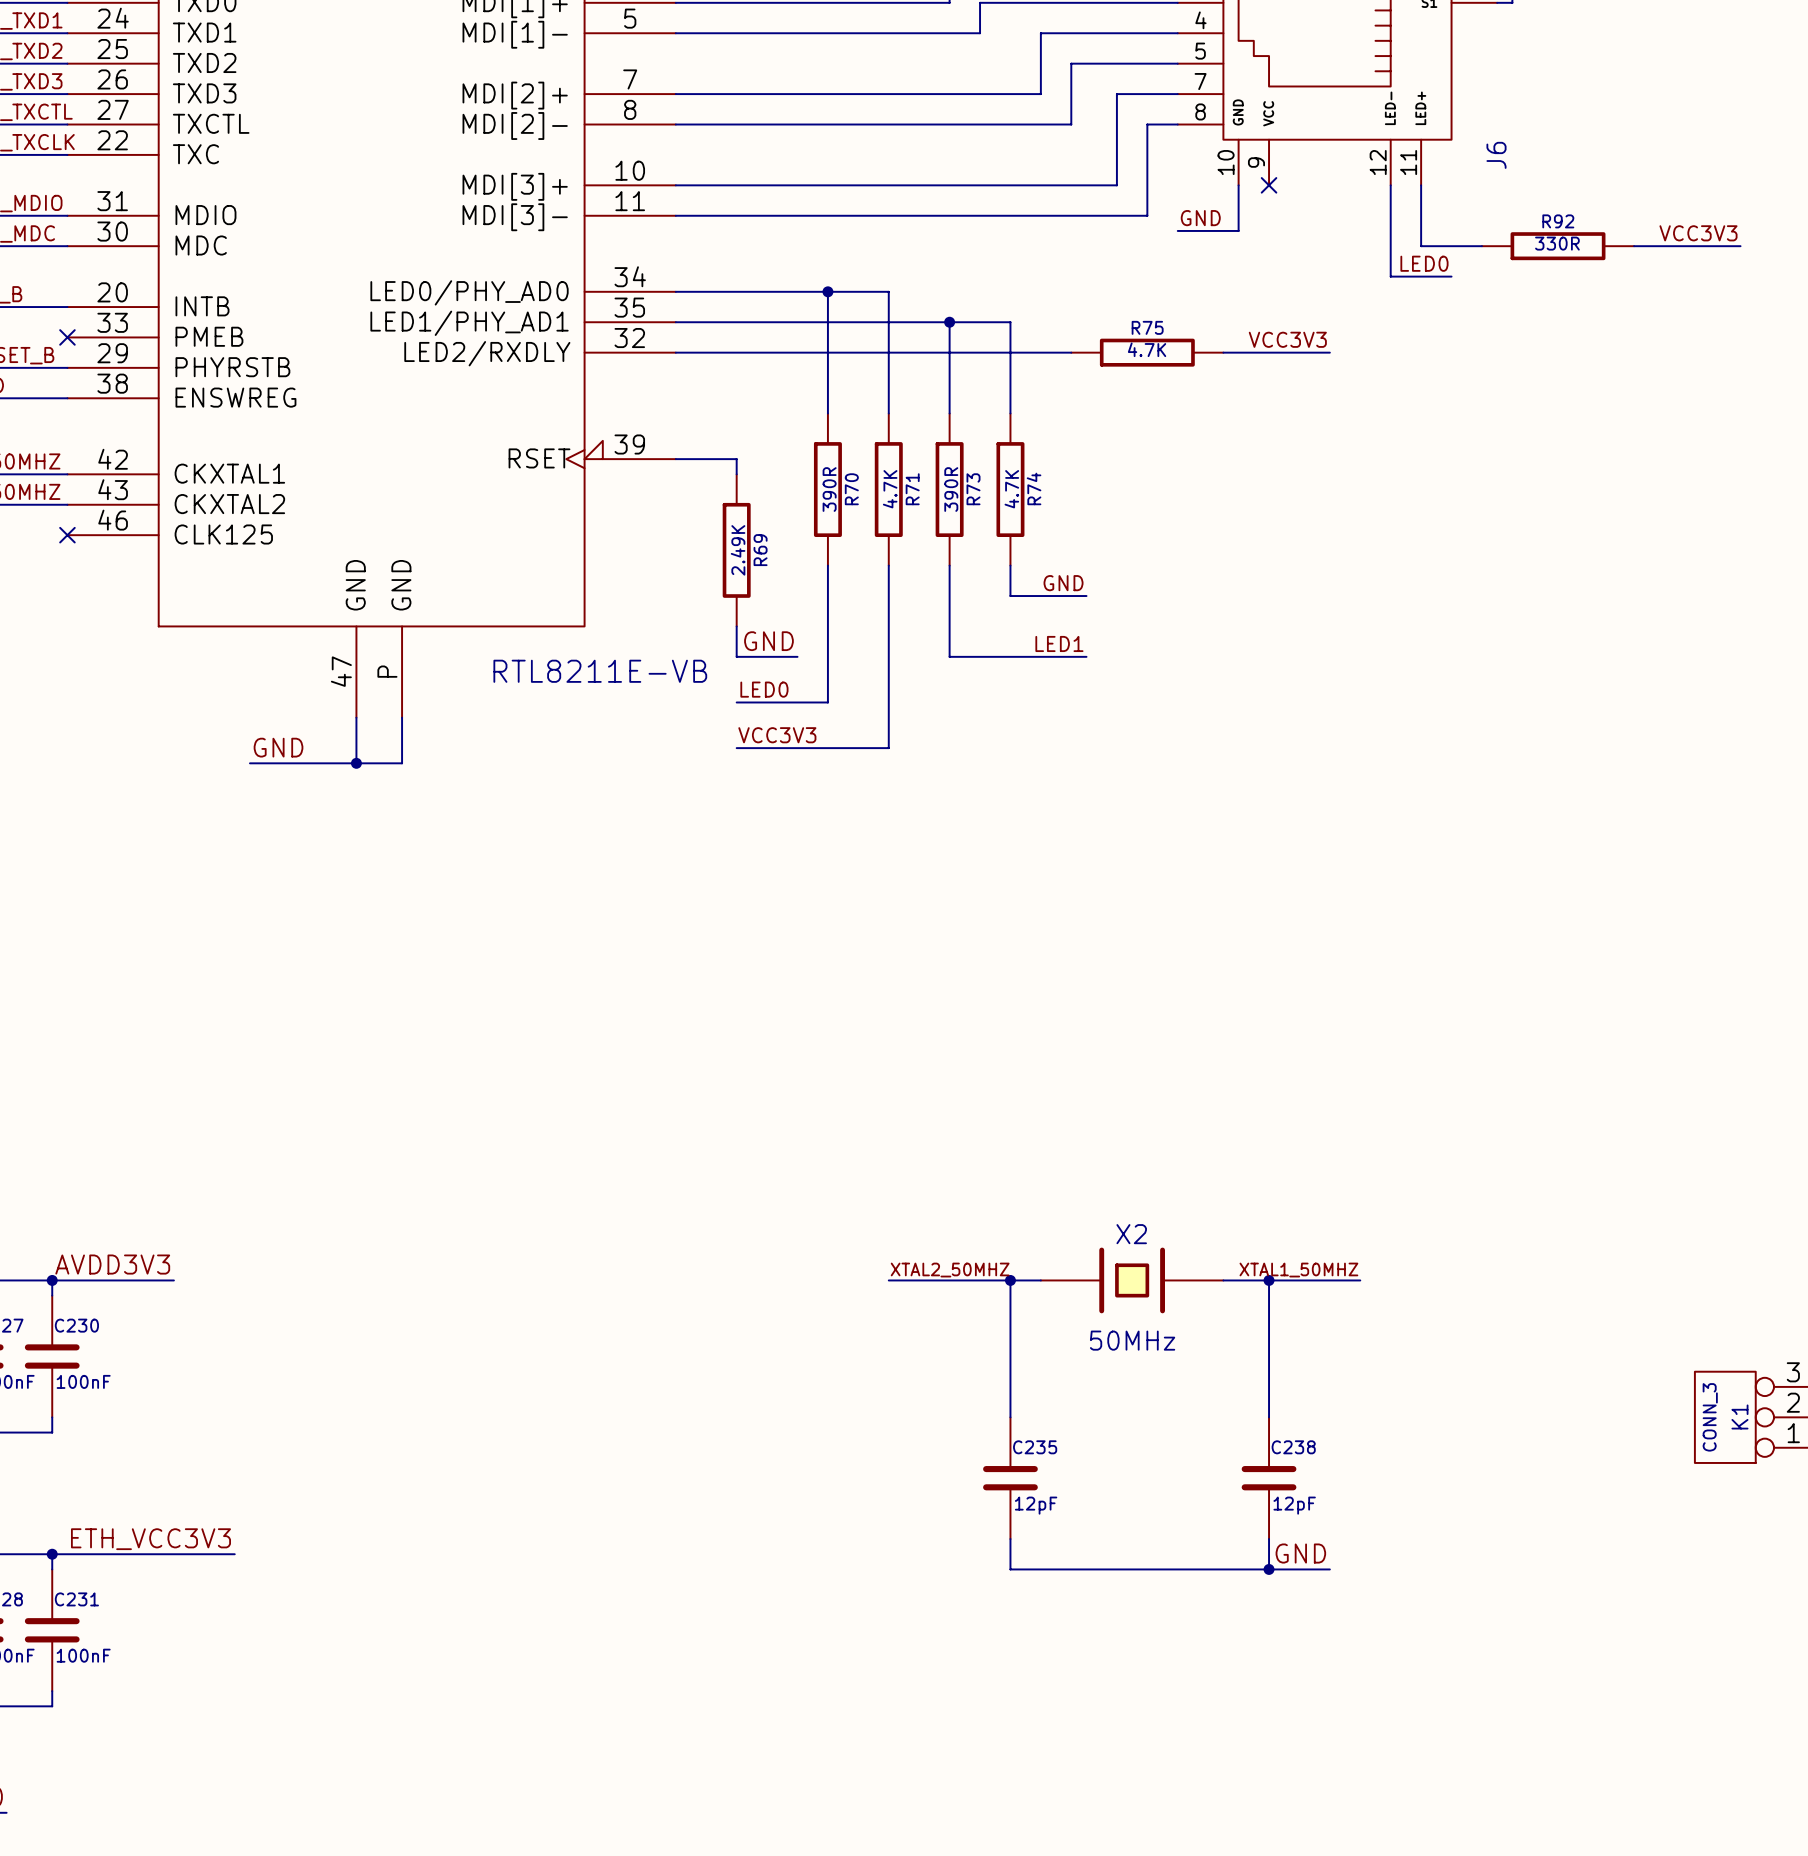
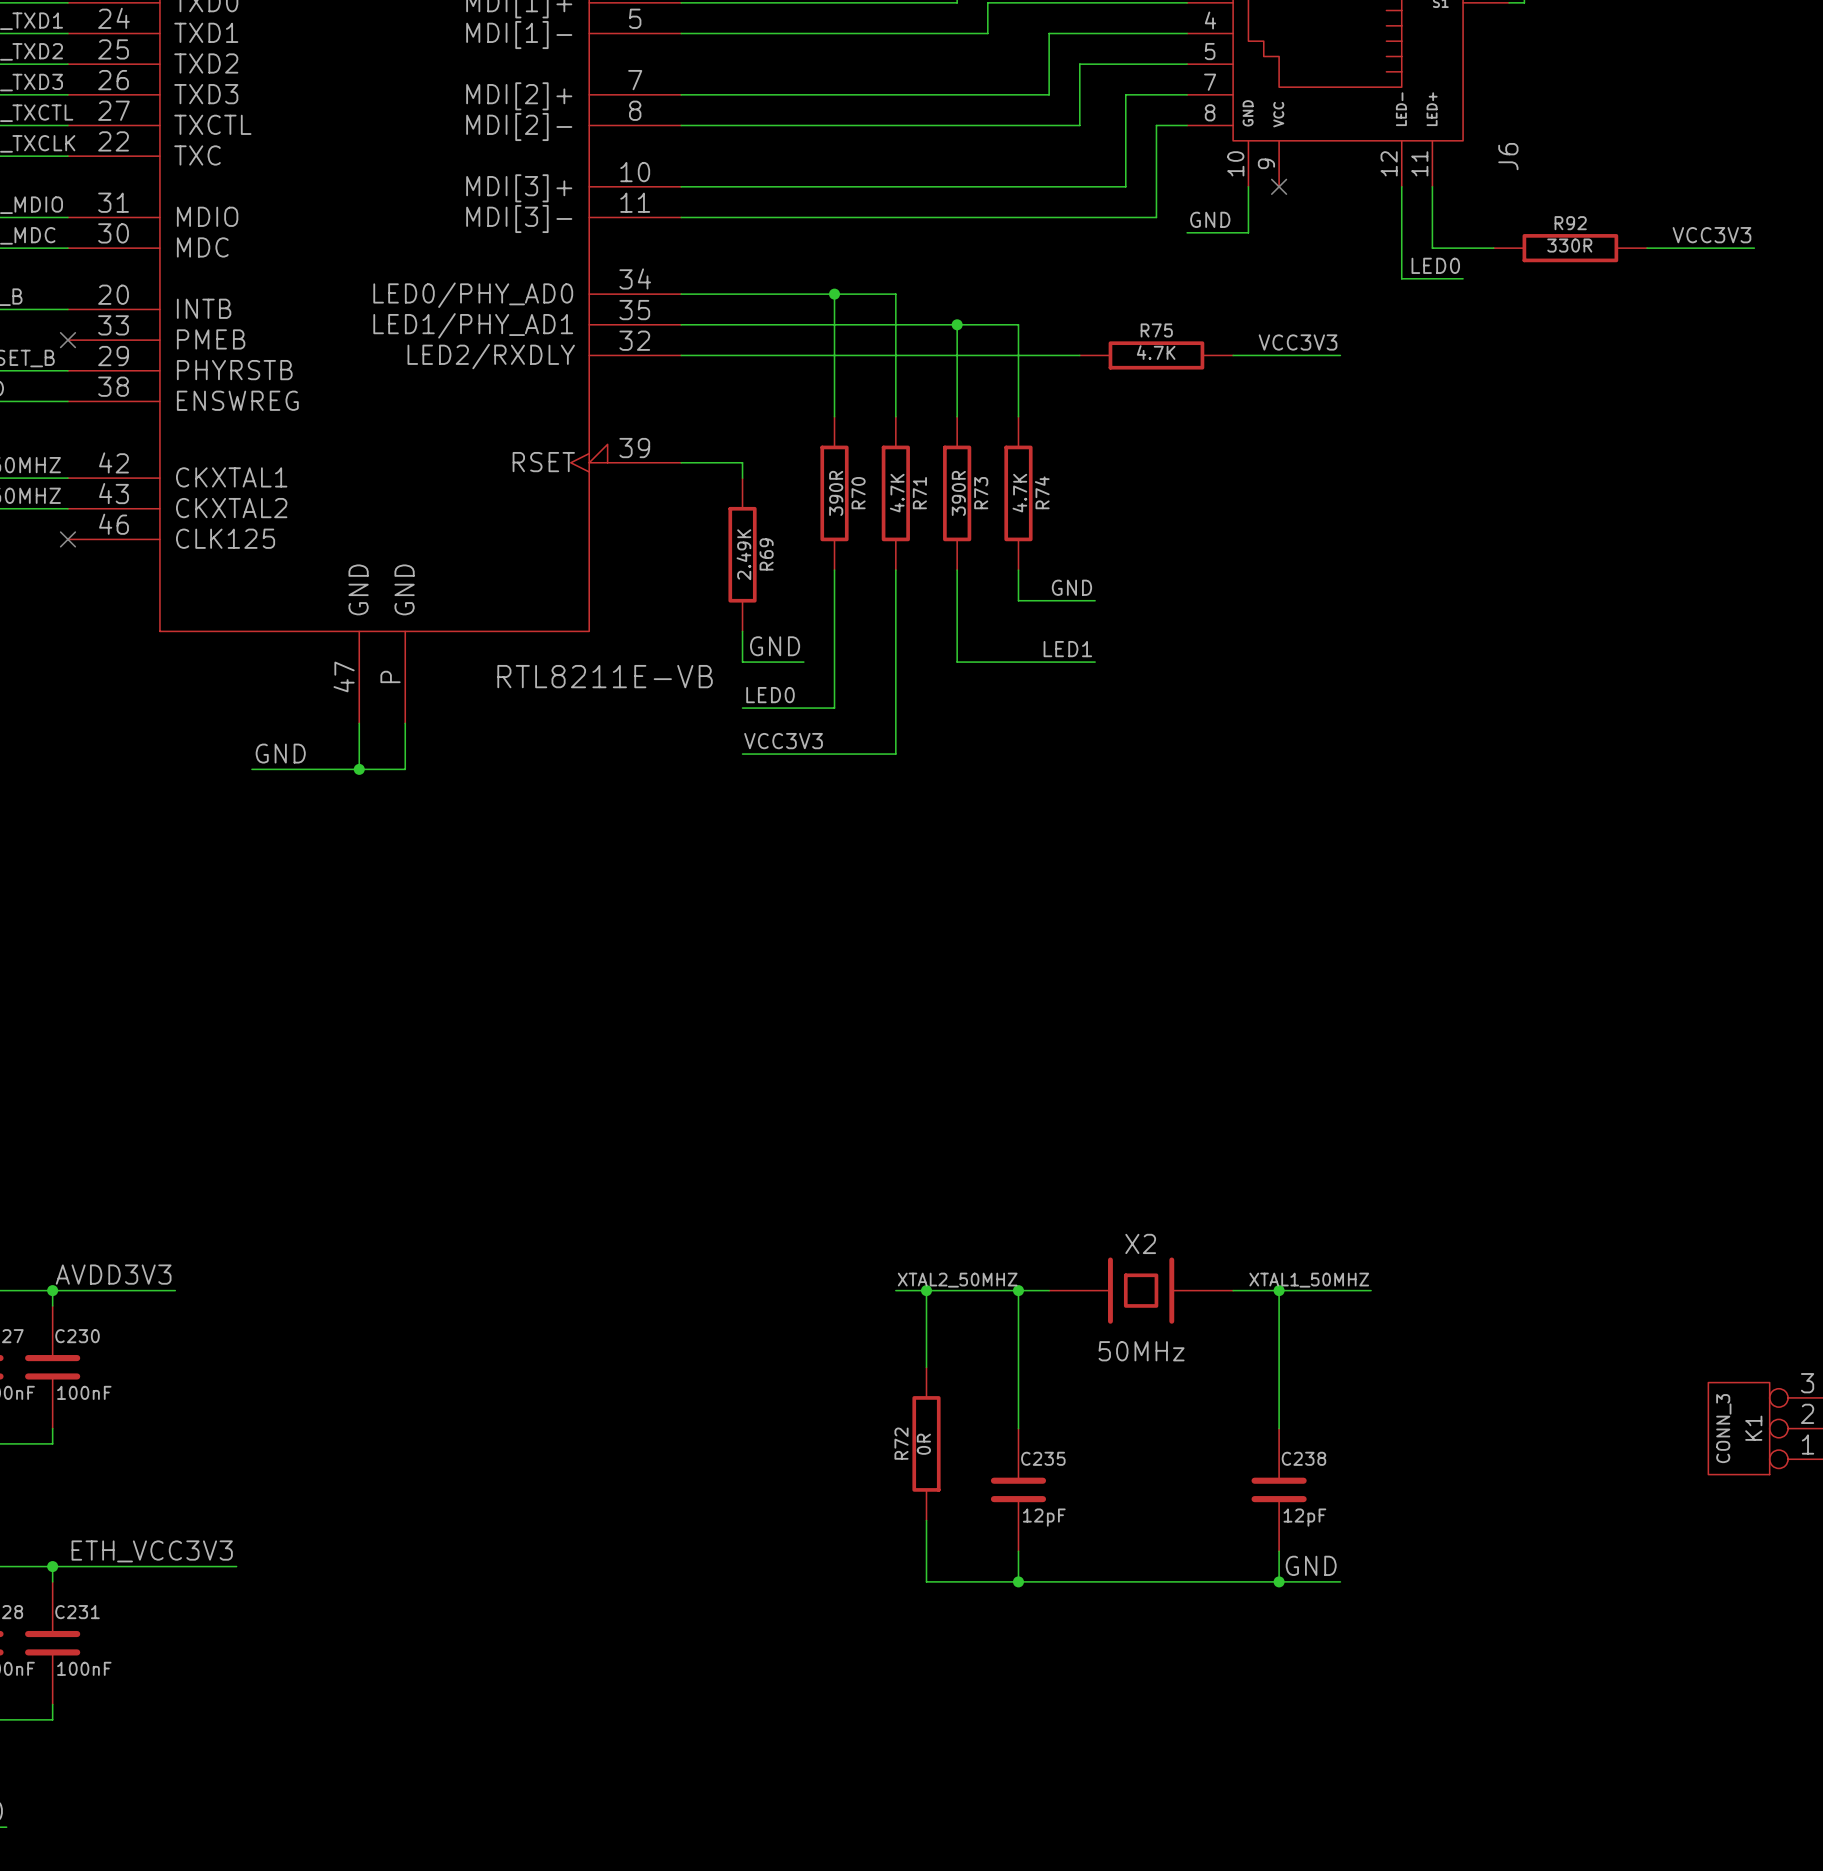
wire: none -> (926, 1290) (926, 1367)
junction: none -> (926, 1290)
R72: none -> 0R (926, 1443)
wire: none -> (926, 1520) (926, 1581) (1018, 1581)
junction: none -> (1018, 1581)

